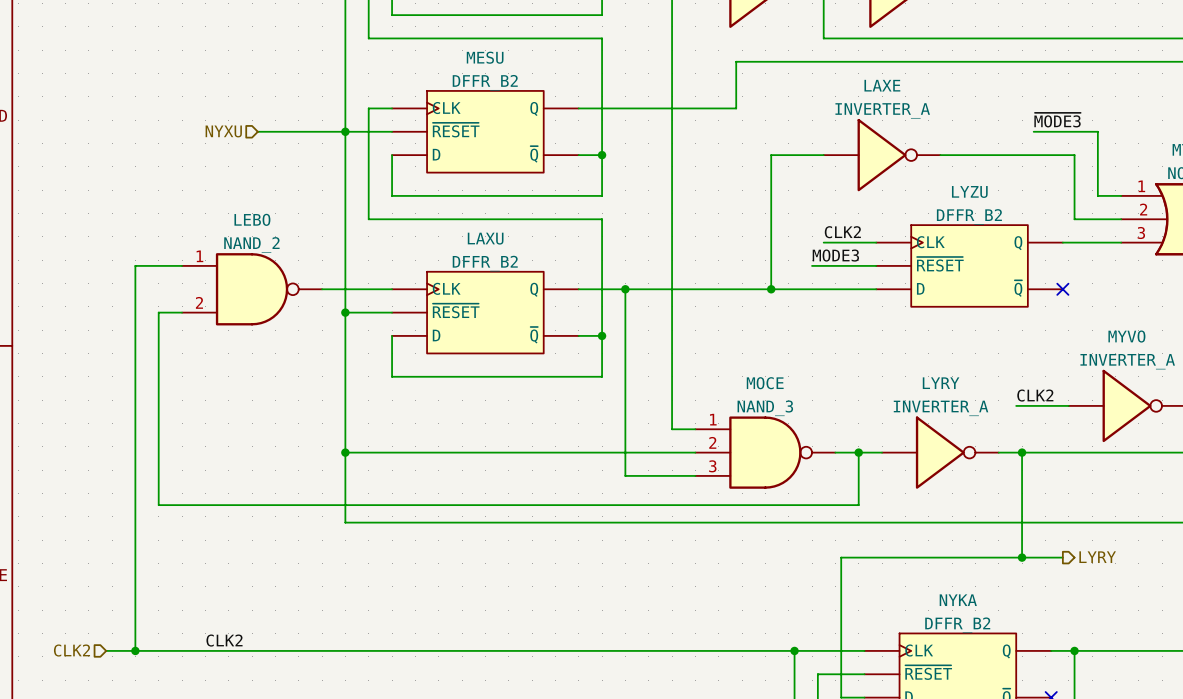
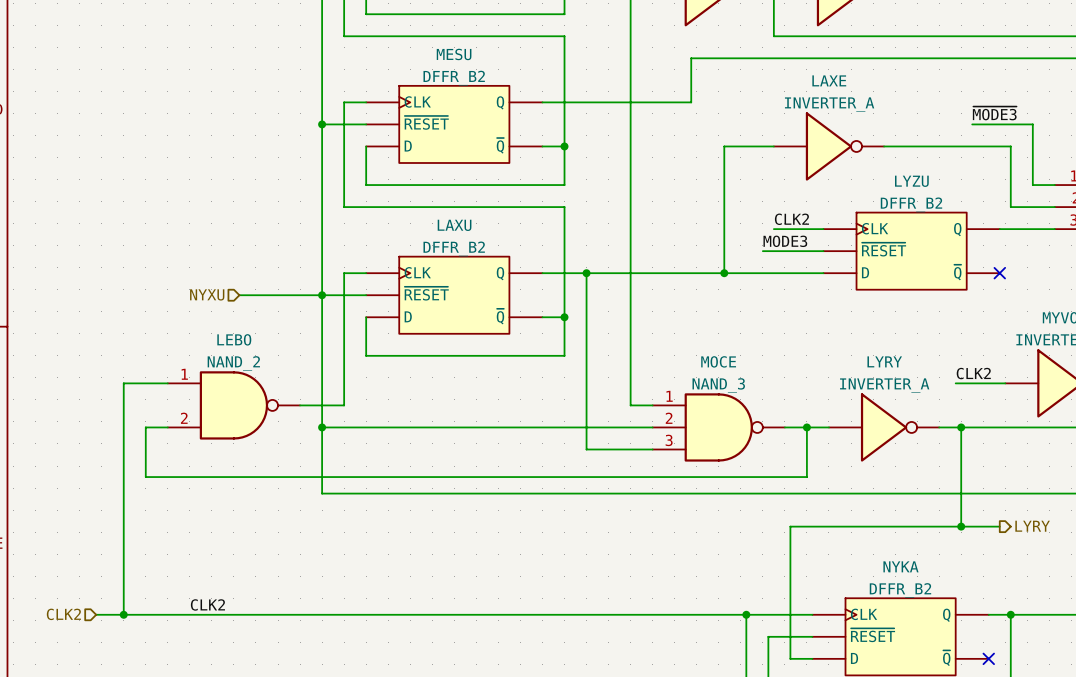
hierarchical label position: NYXU (223, 131) -> NYXU (207, 294)
wire: (257, 131) (345, 131) -> (239, 295) (322, 295)
wire: (182, 265) (135, 265) (135, 405) -> (167, 383) (123, 383)
LEBO position: (252, 289) -> (233, 405)
wire: (322, 289) (368, 289) -> (300, 405) (344, 405) (344, 273)
wire: (182, 312) (158, 312) (158, 452) -> (167, 427) (145, 427)

